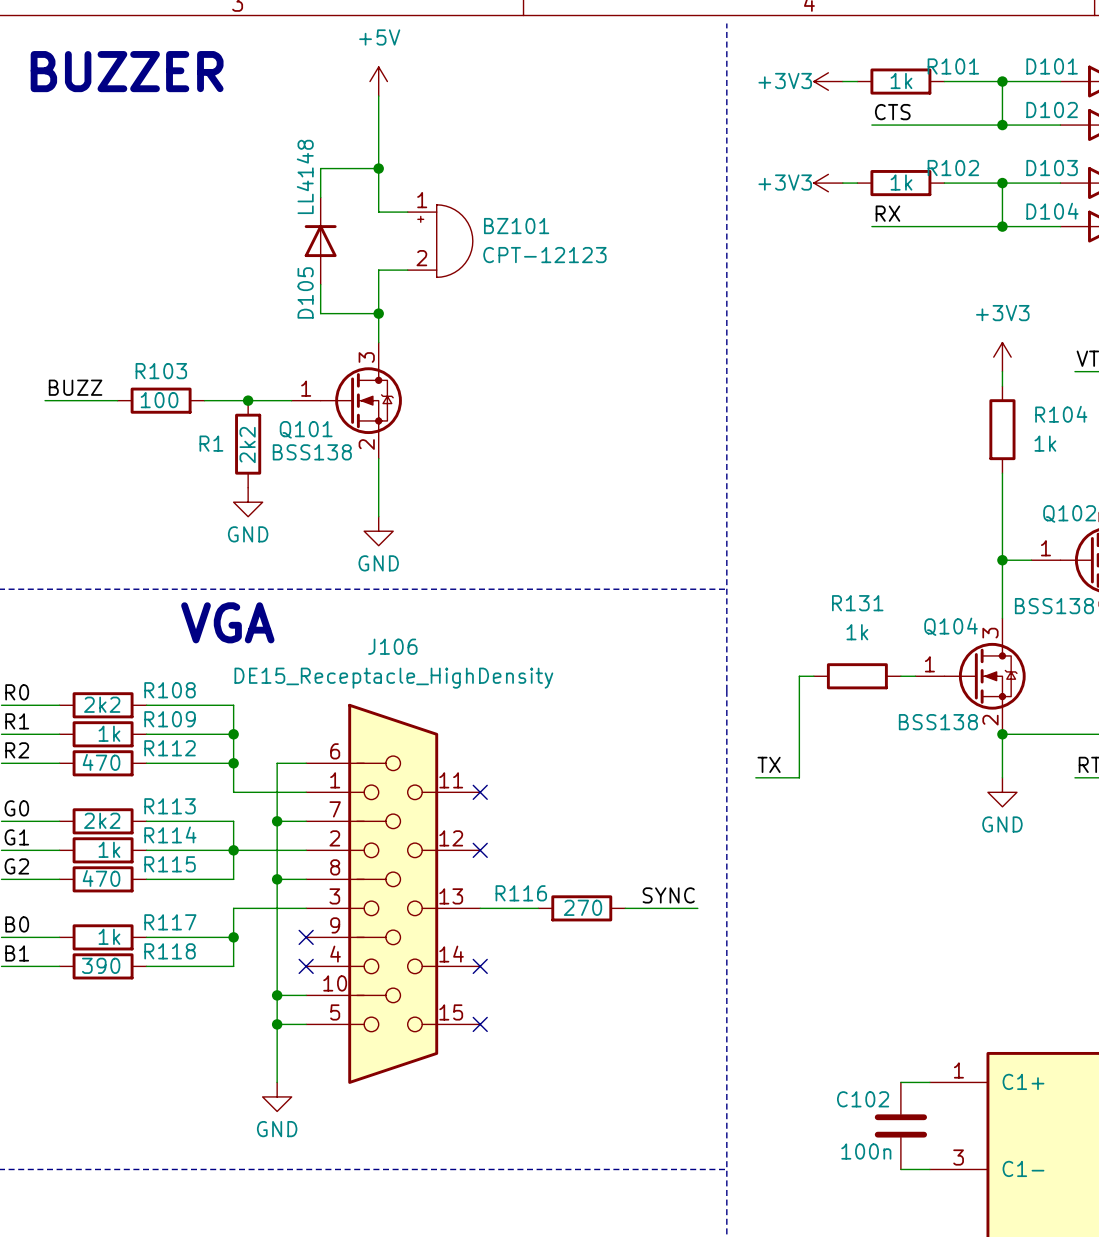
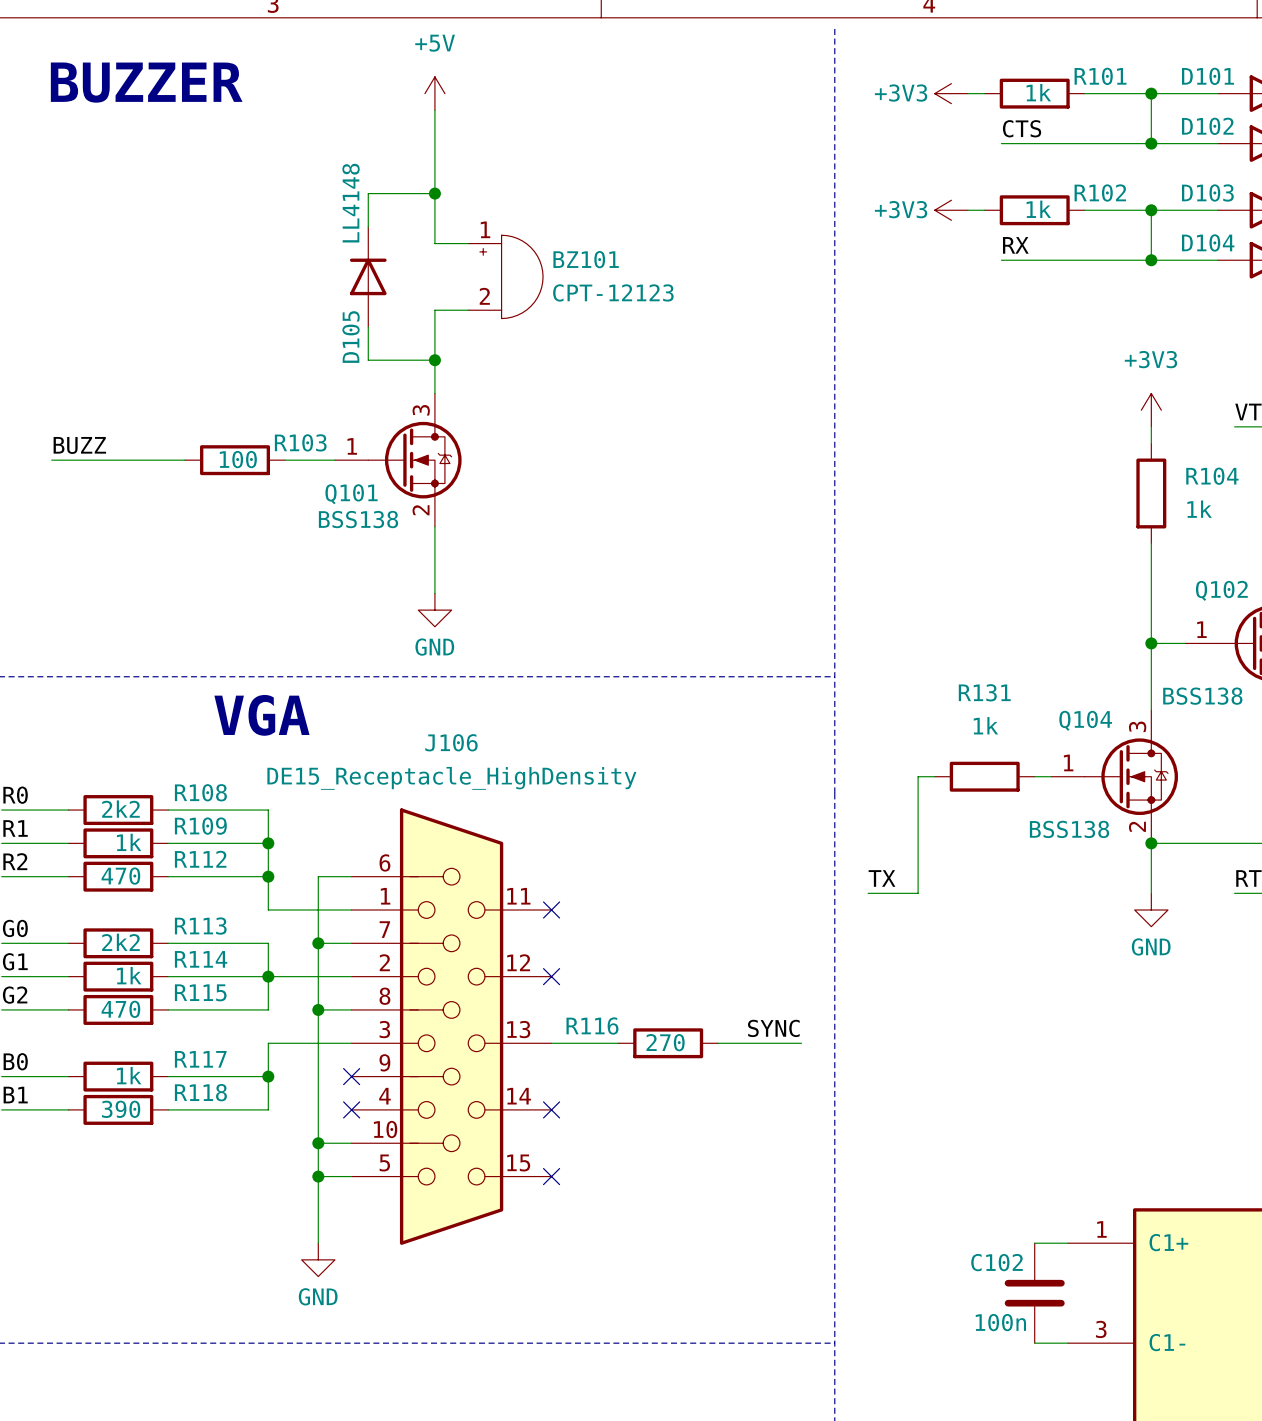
R103 name position: R103 (161, 371) -> R103 (300, 442)
R103 position: (161, 400) -> (235, 460)
wire: (204, 400) (248, 400) -> (135, 460) (185, 460)
junction: (248, 400) -> none
R1: 2k2 (248, 444) -> none
power symbol: GND (248, 502) -> none

